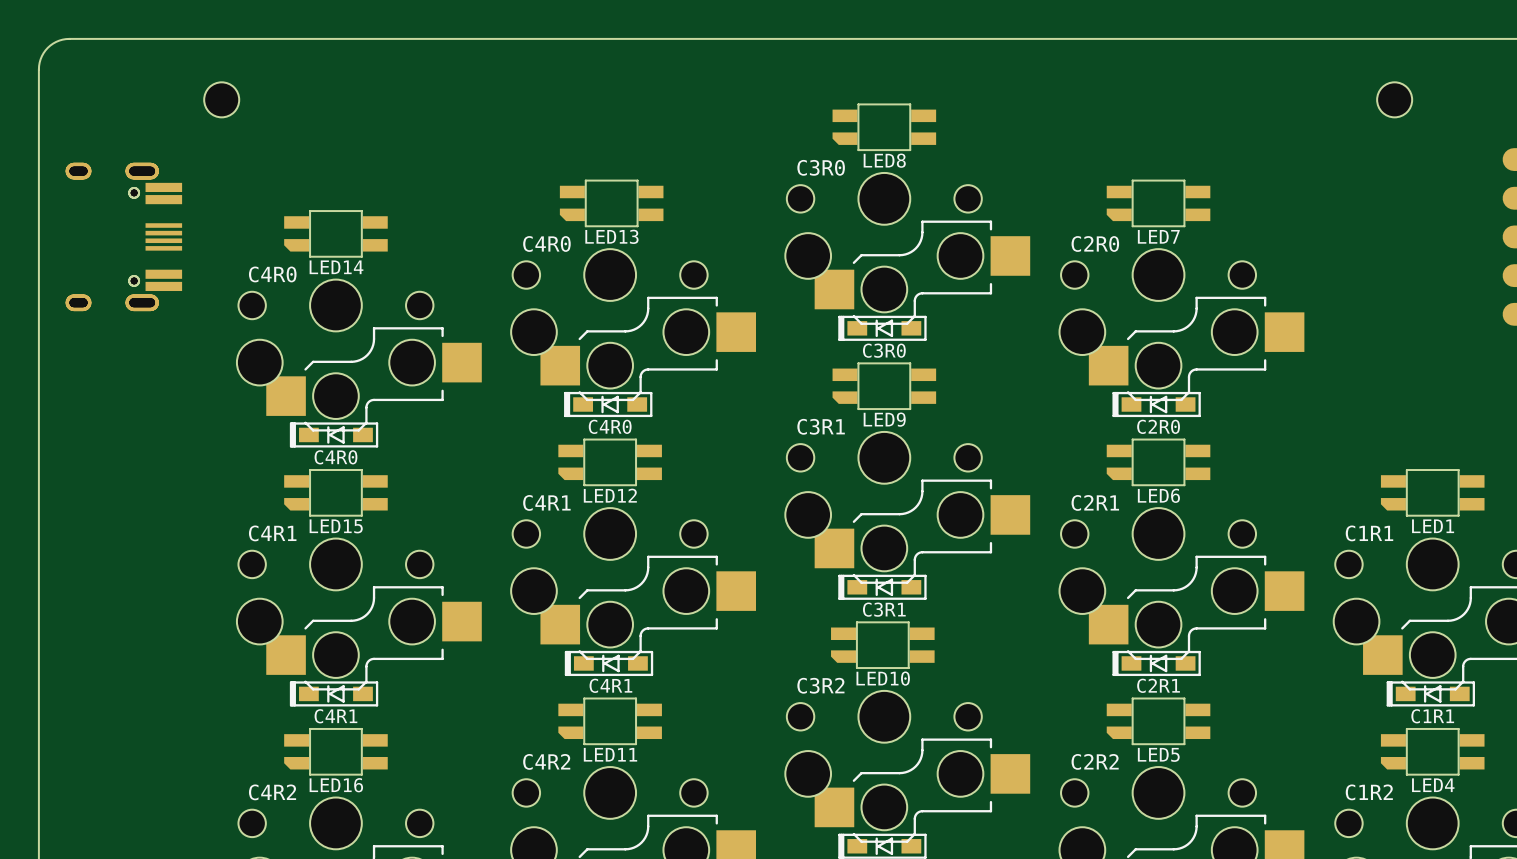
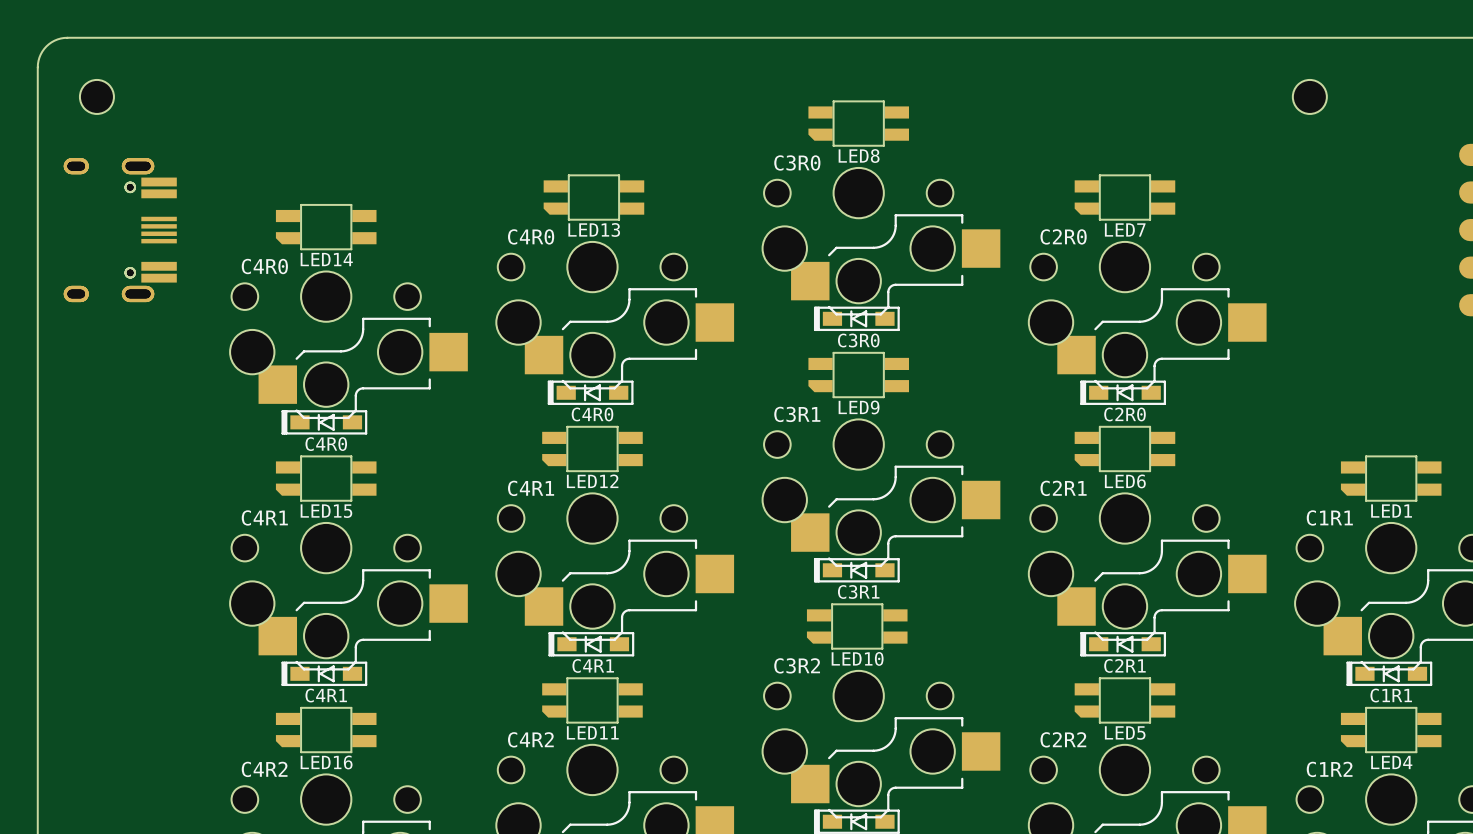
part position: (221, 99) -> (96, 96)
part position: (1394, 99) -> (1309, 96)

